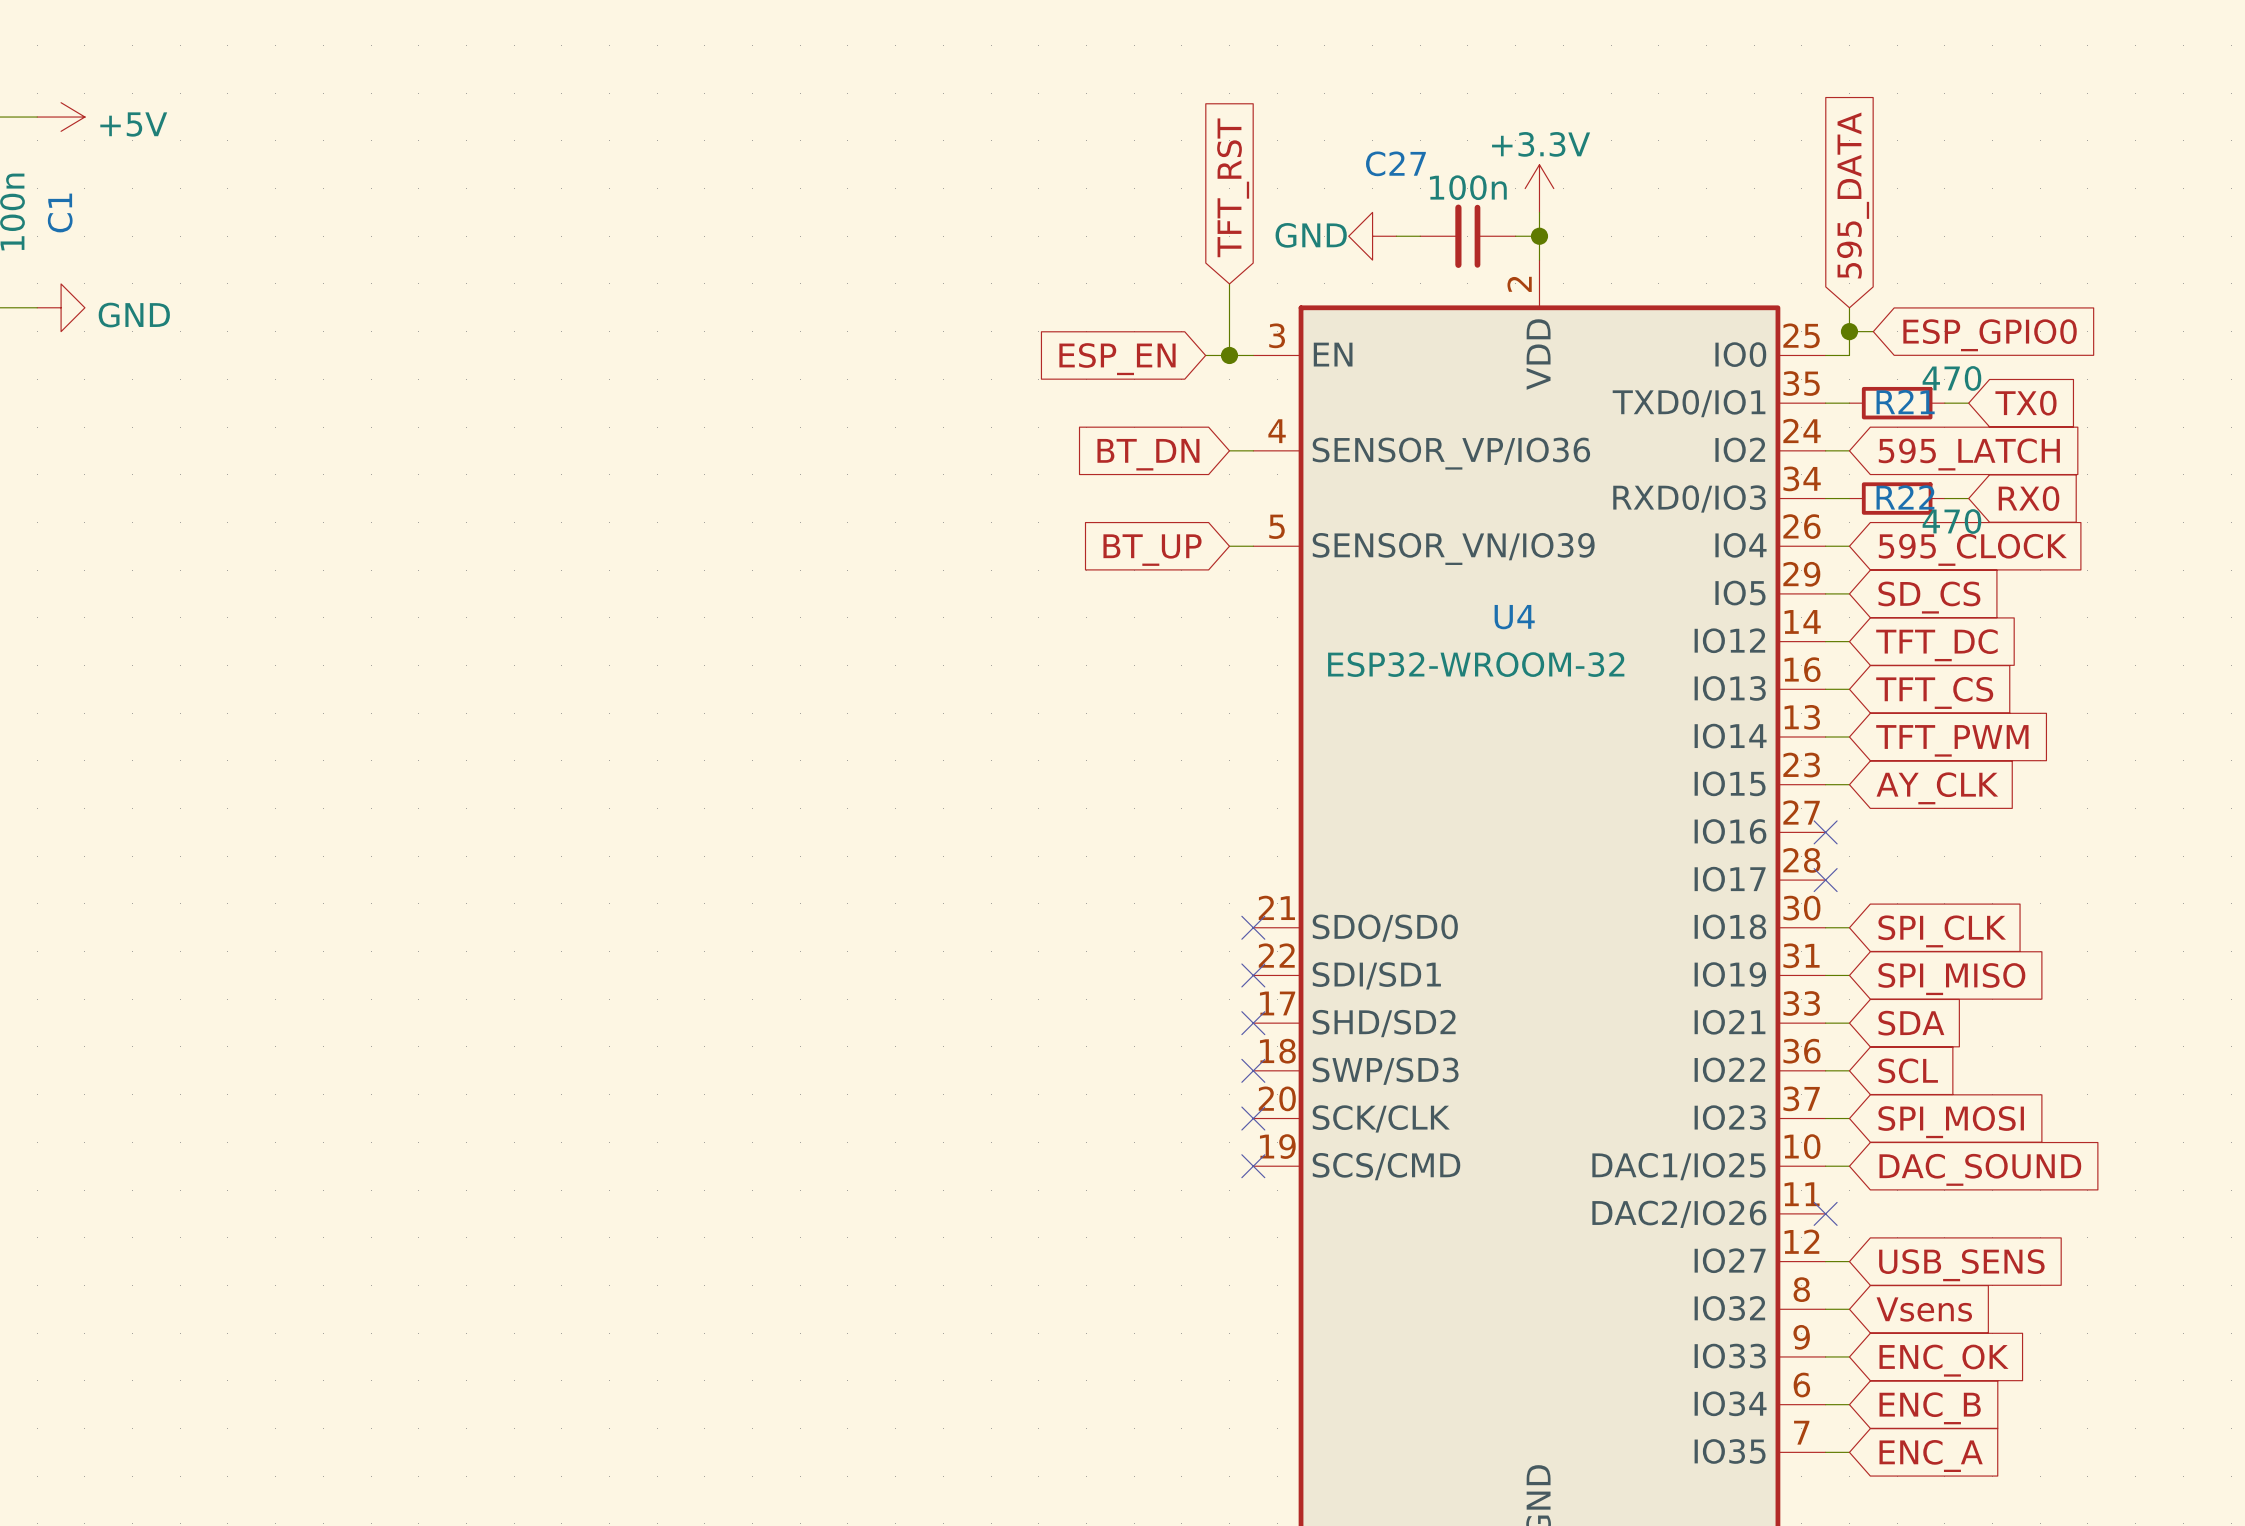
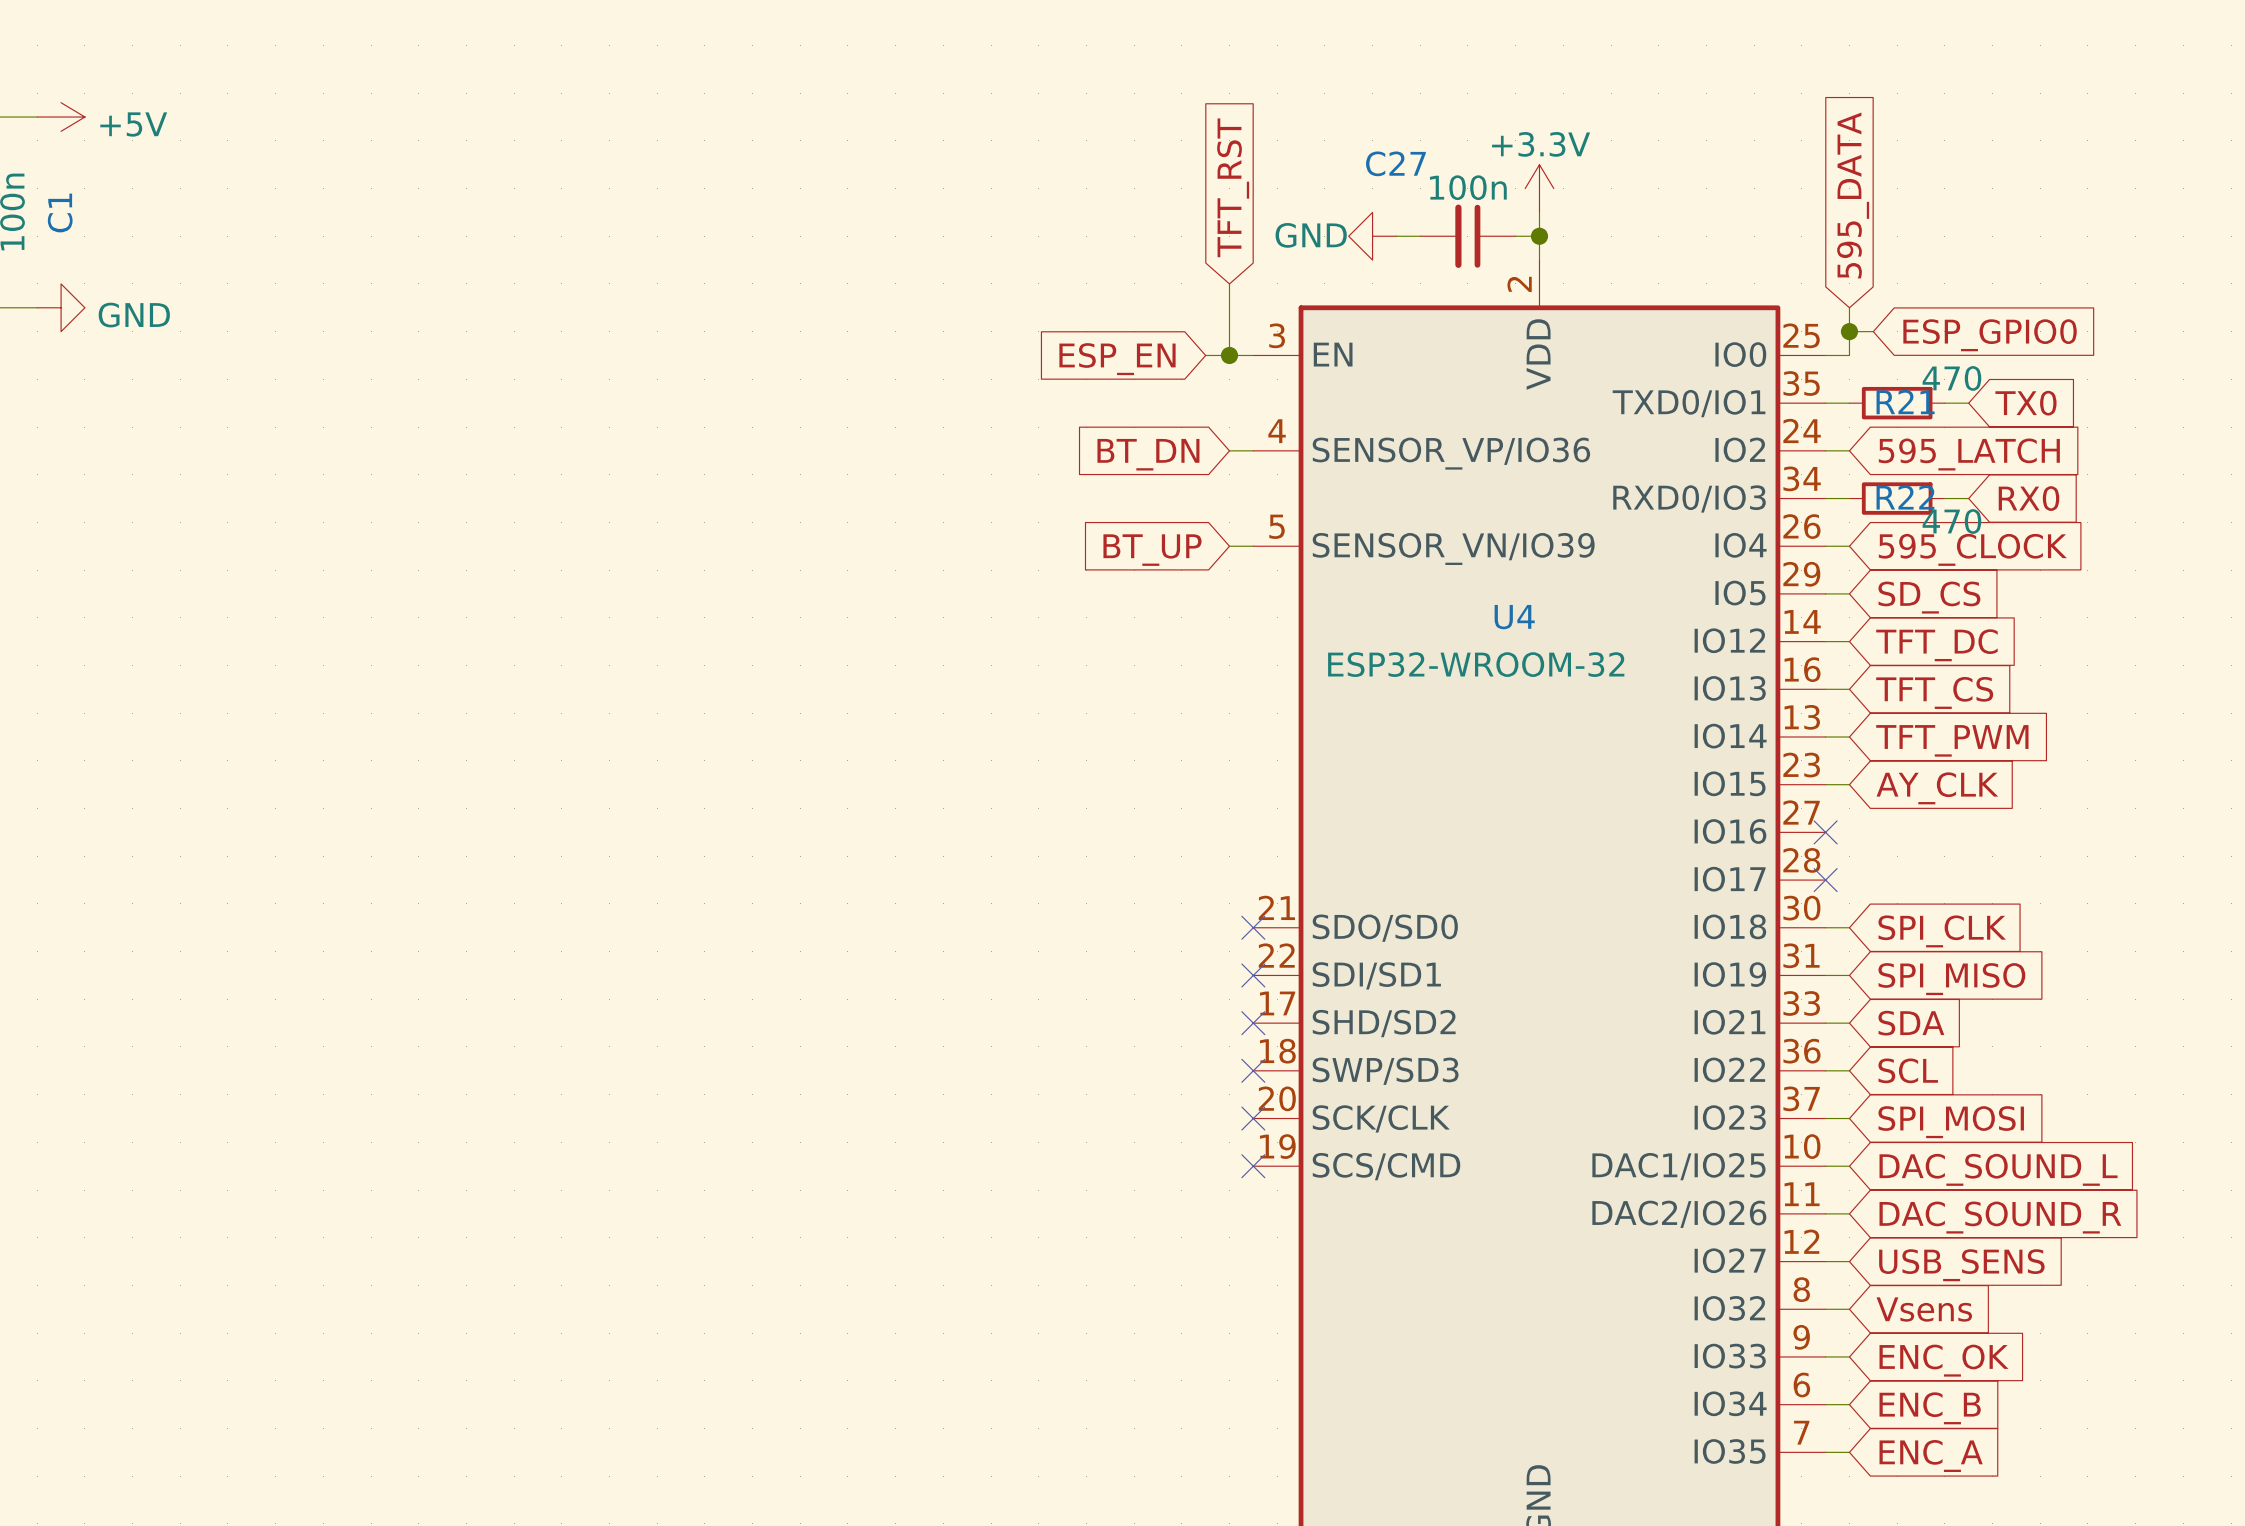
global label: DAC_SOUND (1980, 1169) -> DAC_SOUND_L (1998, 1169)
wire: none -> (1825, 1213) (1849, 1213)
no-connect mark: (1825, 1213) -> none
global label: none -> DAC_SOUND_R (2000, 1217)

